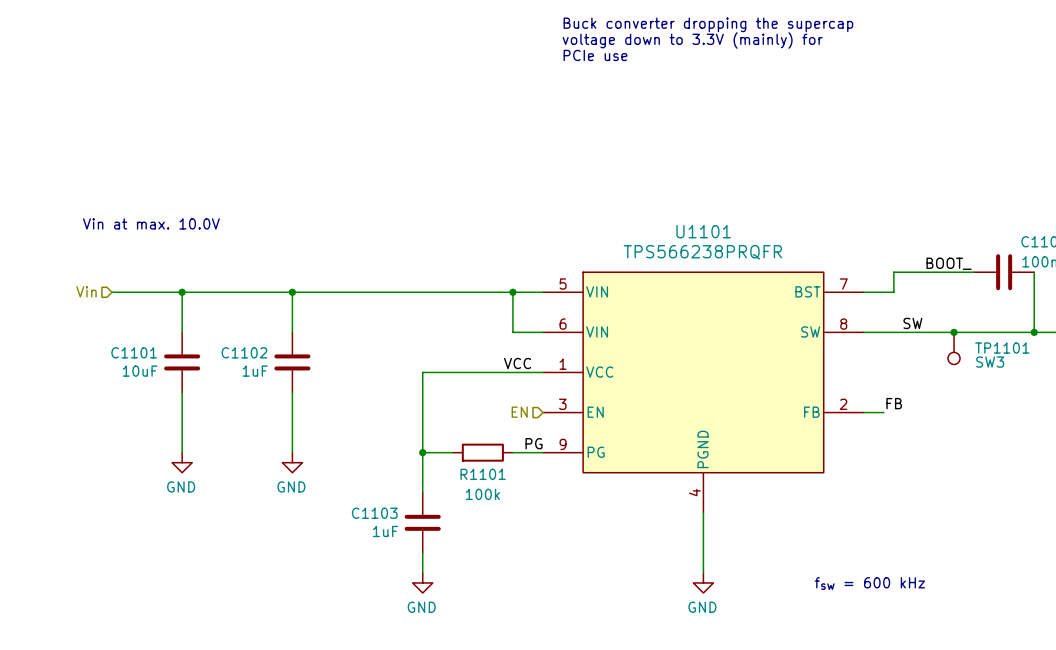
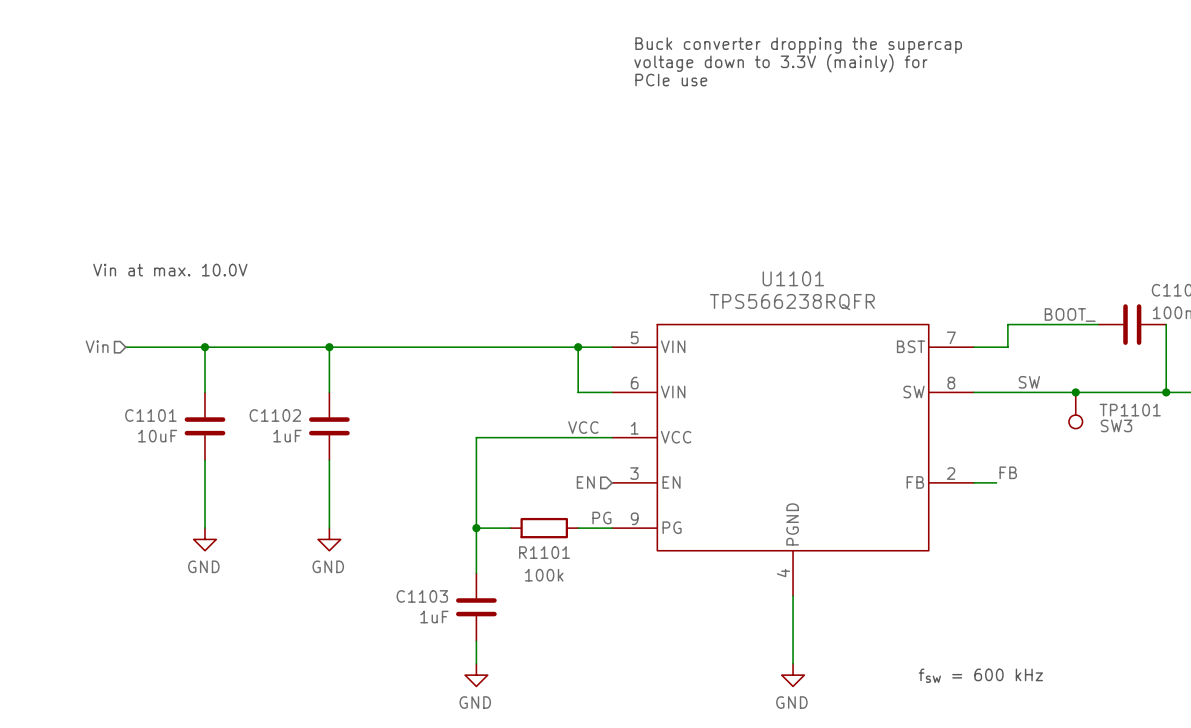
U1101 value: TPS566238PRQFR (702, 252) -> TPS566238RQFR (792, 302)

